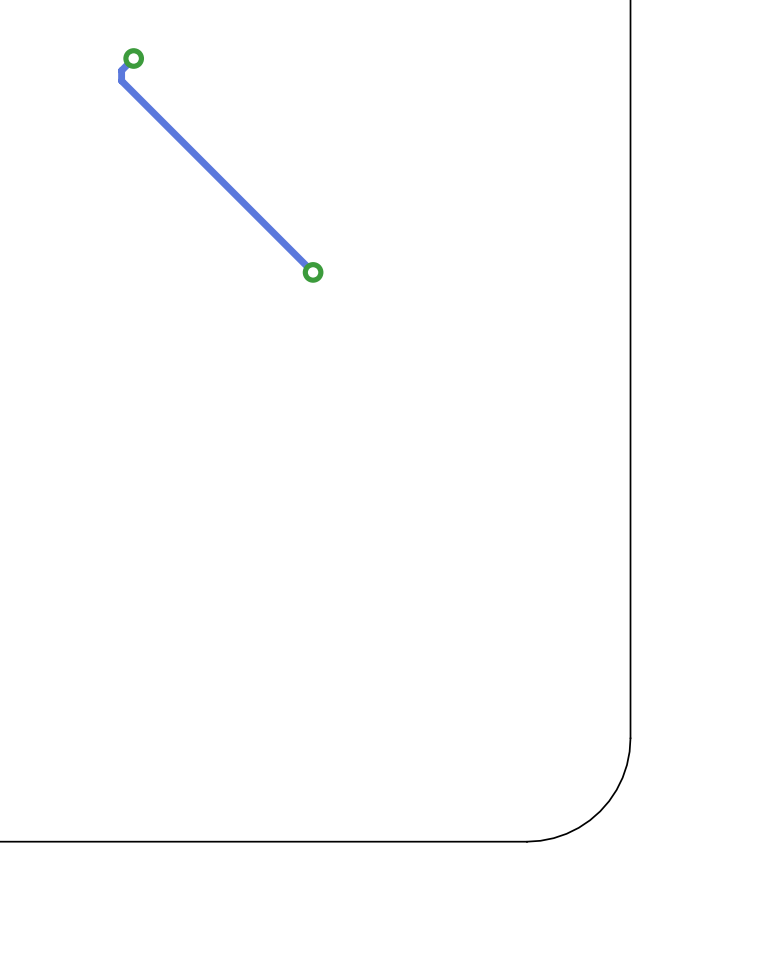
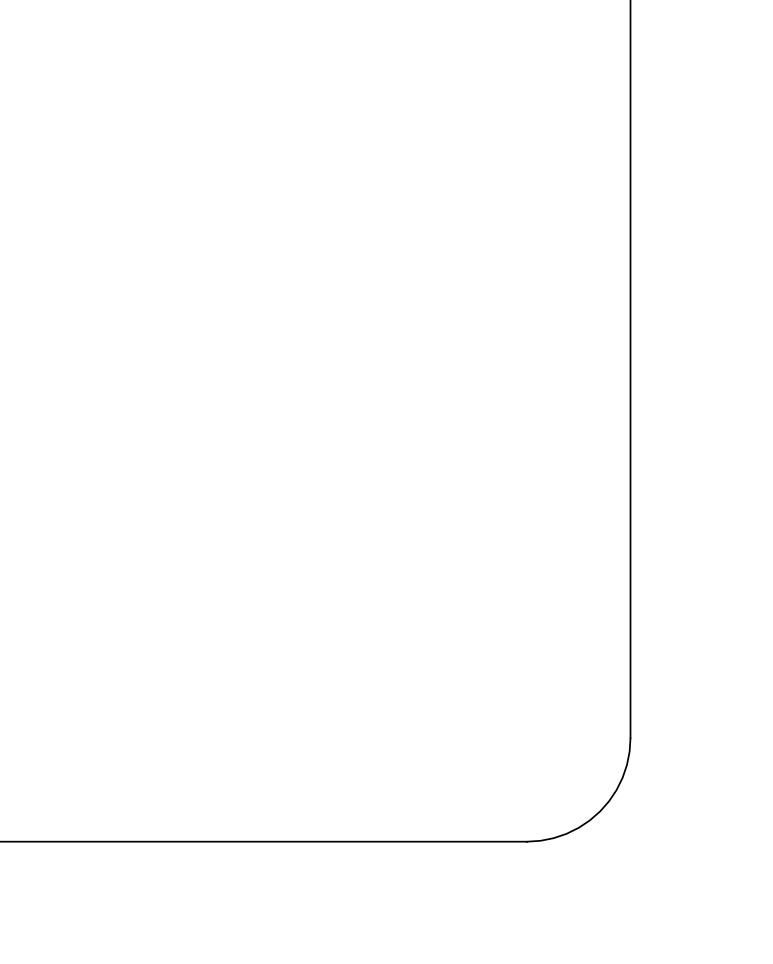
track: (133, 58) (121, 70) (121, 80) (313, 272) -> none
via: (133, 58) -> none
via: (313, 272) -> none

